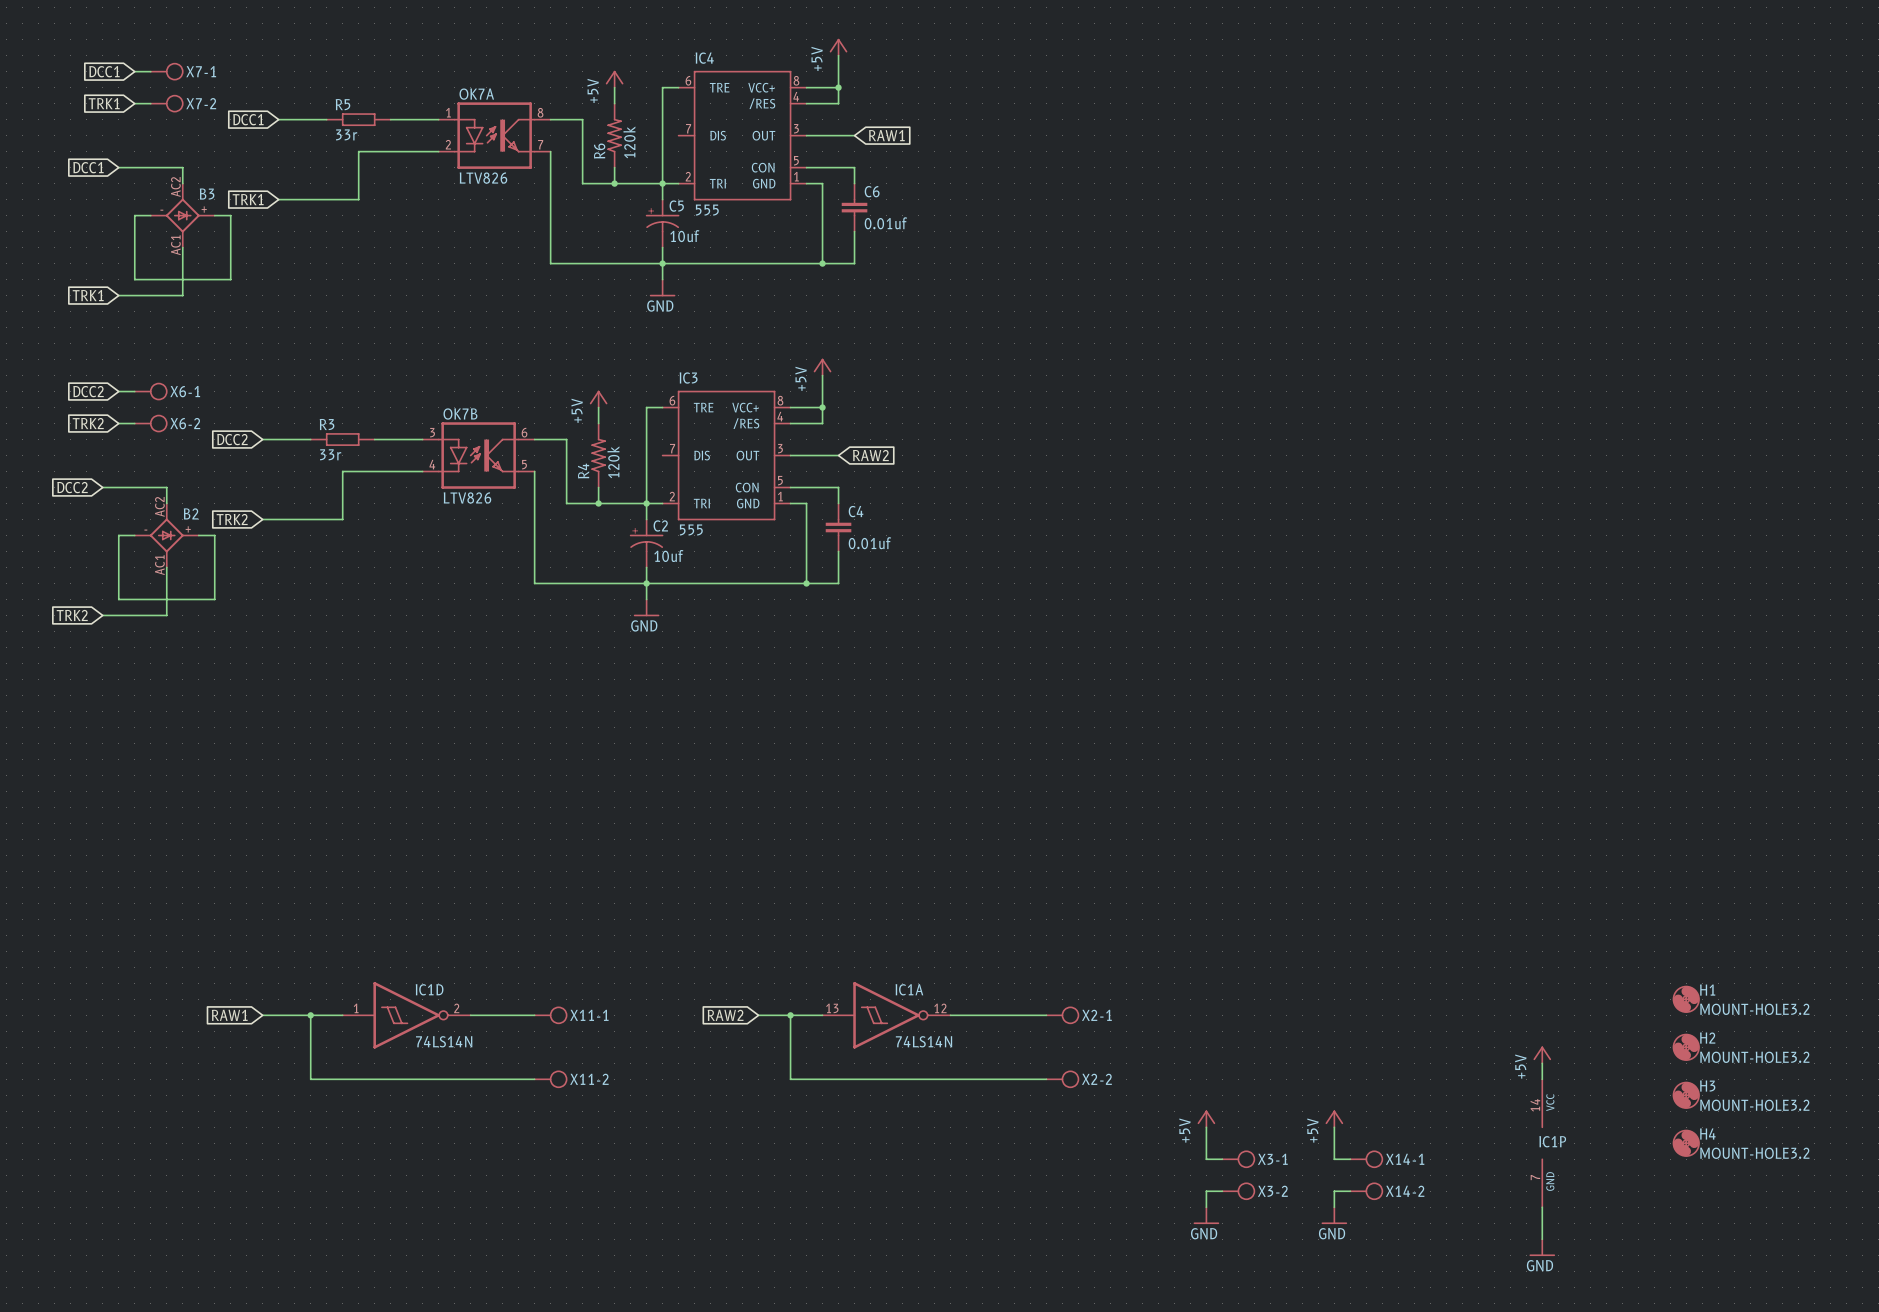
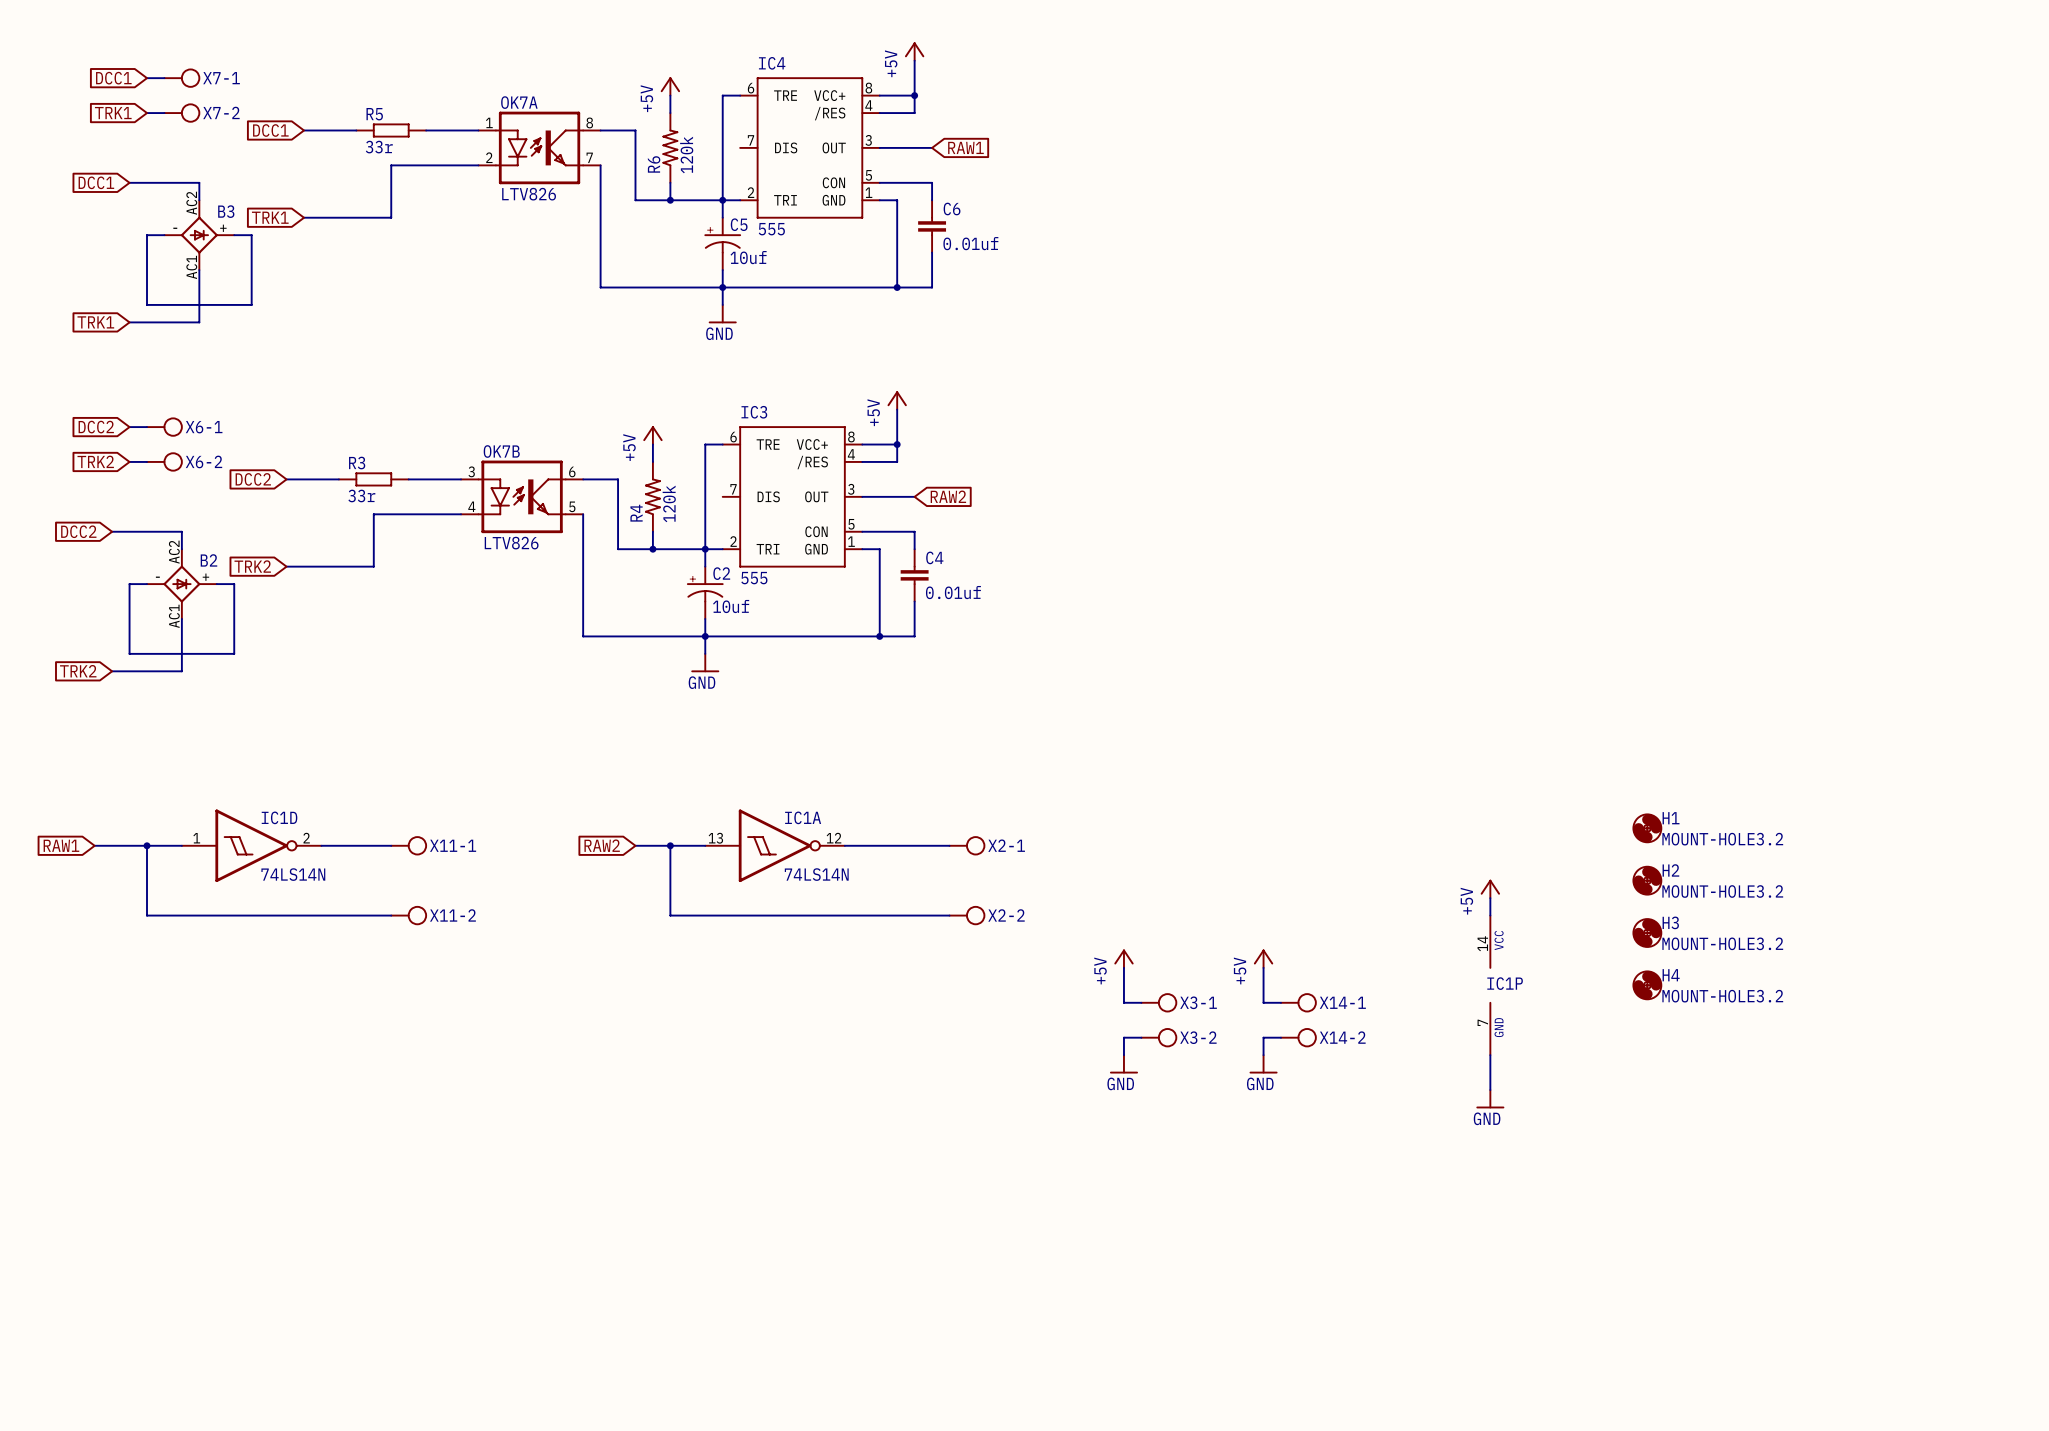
global label: none -> RAW1 (61, 845)
wire: none -> (94, 845) (181, 845)
wire: none -> (147, 845) (147, 915) (391, 915)
junction: none -> (147, 845)
wire: none -> (321, 845) (391, 845)
global label: none -> RAW2 (602, 845)
wire: none -> (635, 845) (705, 845)
wire: none -> (670, 845) (670, 915) (949, 915)
junction: none -> (670, 845)
wire: none -> (844, 845) (949, 845)
power symbol: none -> +5V (1490, 888)
wire: none -> (1490, 898) (1490, 915)
power symbol: none -> +5V (1123, 958)
power symbol: none -> +5V (1263, 958)
wire: none -> (1123, 967) (1123, 1002) (1141, 1002)
wire: none -> (1263, 967) (1263, 1002) (1281, 1002)
wire: none -> (1141, 1037) (1123, 1037) (1123, 1055)
wire: none -> (1281, 1037) (1263, 1037) (1263, 1055)
wire: none -> (1490, 1055) (1490, 1090)
power symbol: none -> GND (1123, 1064)
power symbol: none -> GND (1263, 1064)
H1 position: (1686, 999) -> (1647, 828)
power symbol: none -> GND (1490, 1099)
global label: RAW1 (229, 1015) -> none
wire: (262, 1015) (342, 1015) -> none
wire: (310, 1015) (310, 1079) (534, 1079) -> none
junction: (310, 1015) -> none
IC1D position: (406, 1015) -> (251, 845)
wire: (470, 1015) (534, 1015) -> none
X11-1 position: (551, 1015) -> (409, 845)
global label: RAW2 (725, 1015) -> none
wire: (758, 1015) (822, 1015) -> none
wire: (790, 1015) (790, 1079) (1046, 1079) -> none
junction: (790, 1015) -> none
IC1A position: (886, 1015) -> (775, 845)
wire: (950, 1015) (1046, 1015) -> none
X2-1 position: (1062, 1015) -> (967, 845)
H2 position: (1686, 1047) -> (1647, 880)
power symbol: +5V (1542, 1054) -> none
wire: (1542, 1063) (1542, 1079) -> none
X11-2 position: (551, 1079) -> (409, 915)
X2-2 position: (1062, 1079) -> (967, 915)
H3 position: (1686, 1095) -> (1647, 933)
power symbol: +5V (1206, 1118) -> none
power symbol: +5V (1334, 1118) -> none
wire: (1206, 1127) (1206, 1159) (1222, 1159) -> none
wire: (1334, 1127) (1334, 1159) (1350, 1159) -> none
IC1P position: (1542, 1143) -> (1490, 985)
H4 position: (1686, 1143) -> (1647, 985)
X3-1 position: (1238, 1159) -> (1159, 1002)
X14-1 position: (1366, 1159) -> (1298, 1002)
wire: (1222, 1191) (1206, 1191) (1206, 1207) -> none
X3-2 position: (1238, 1191) -> (1159, 1037)
wire: (1350, 1191) (1334, 1191) (1334, 1207) -> none
X14-2 position: (1366, 1191) -> (1298, 1037)
wire: (1542, 1207) (1542, 1239) -> none
power symbol: GND (1206, 1215) -> none
power symbol: GND (1334, 1215) -> none
power symbol: GND (1542, 1247) -> none

